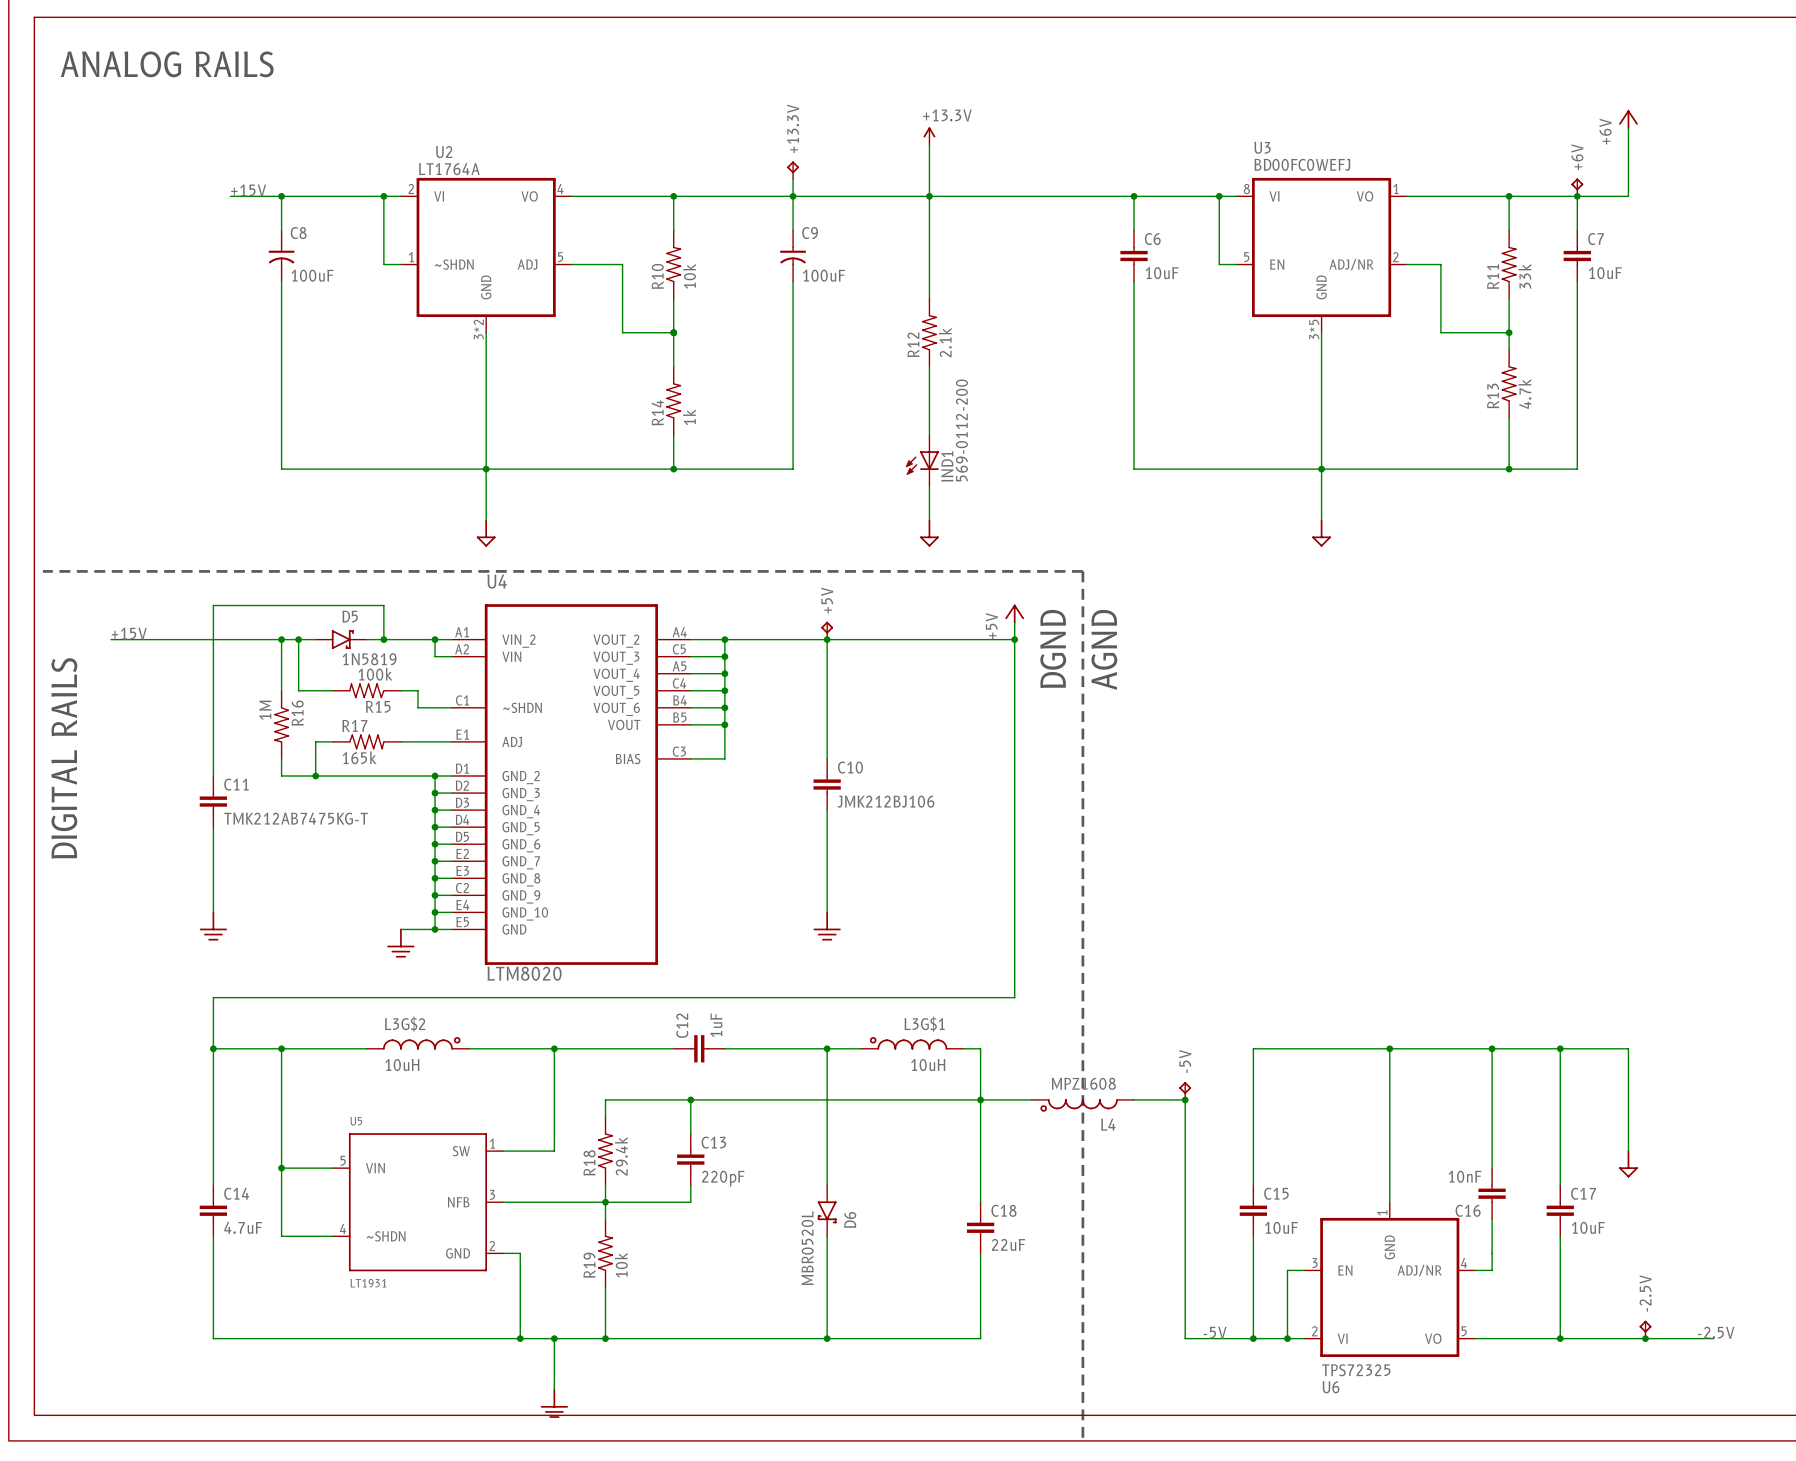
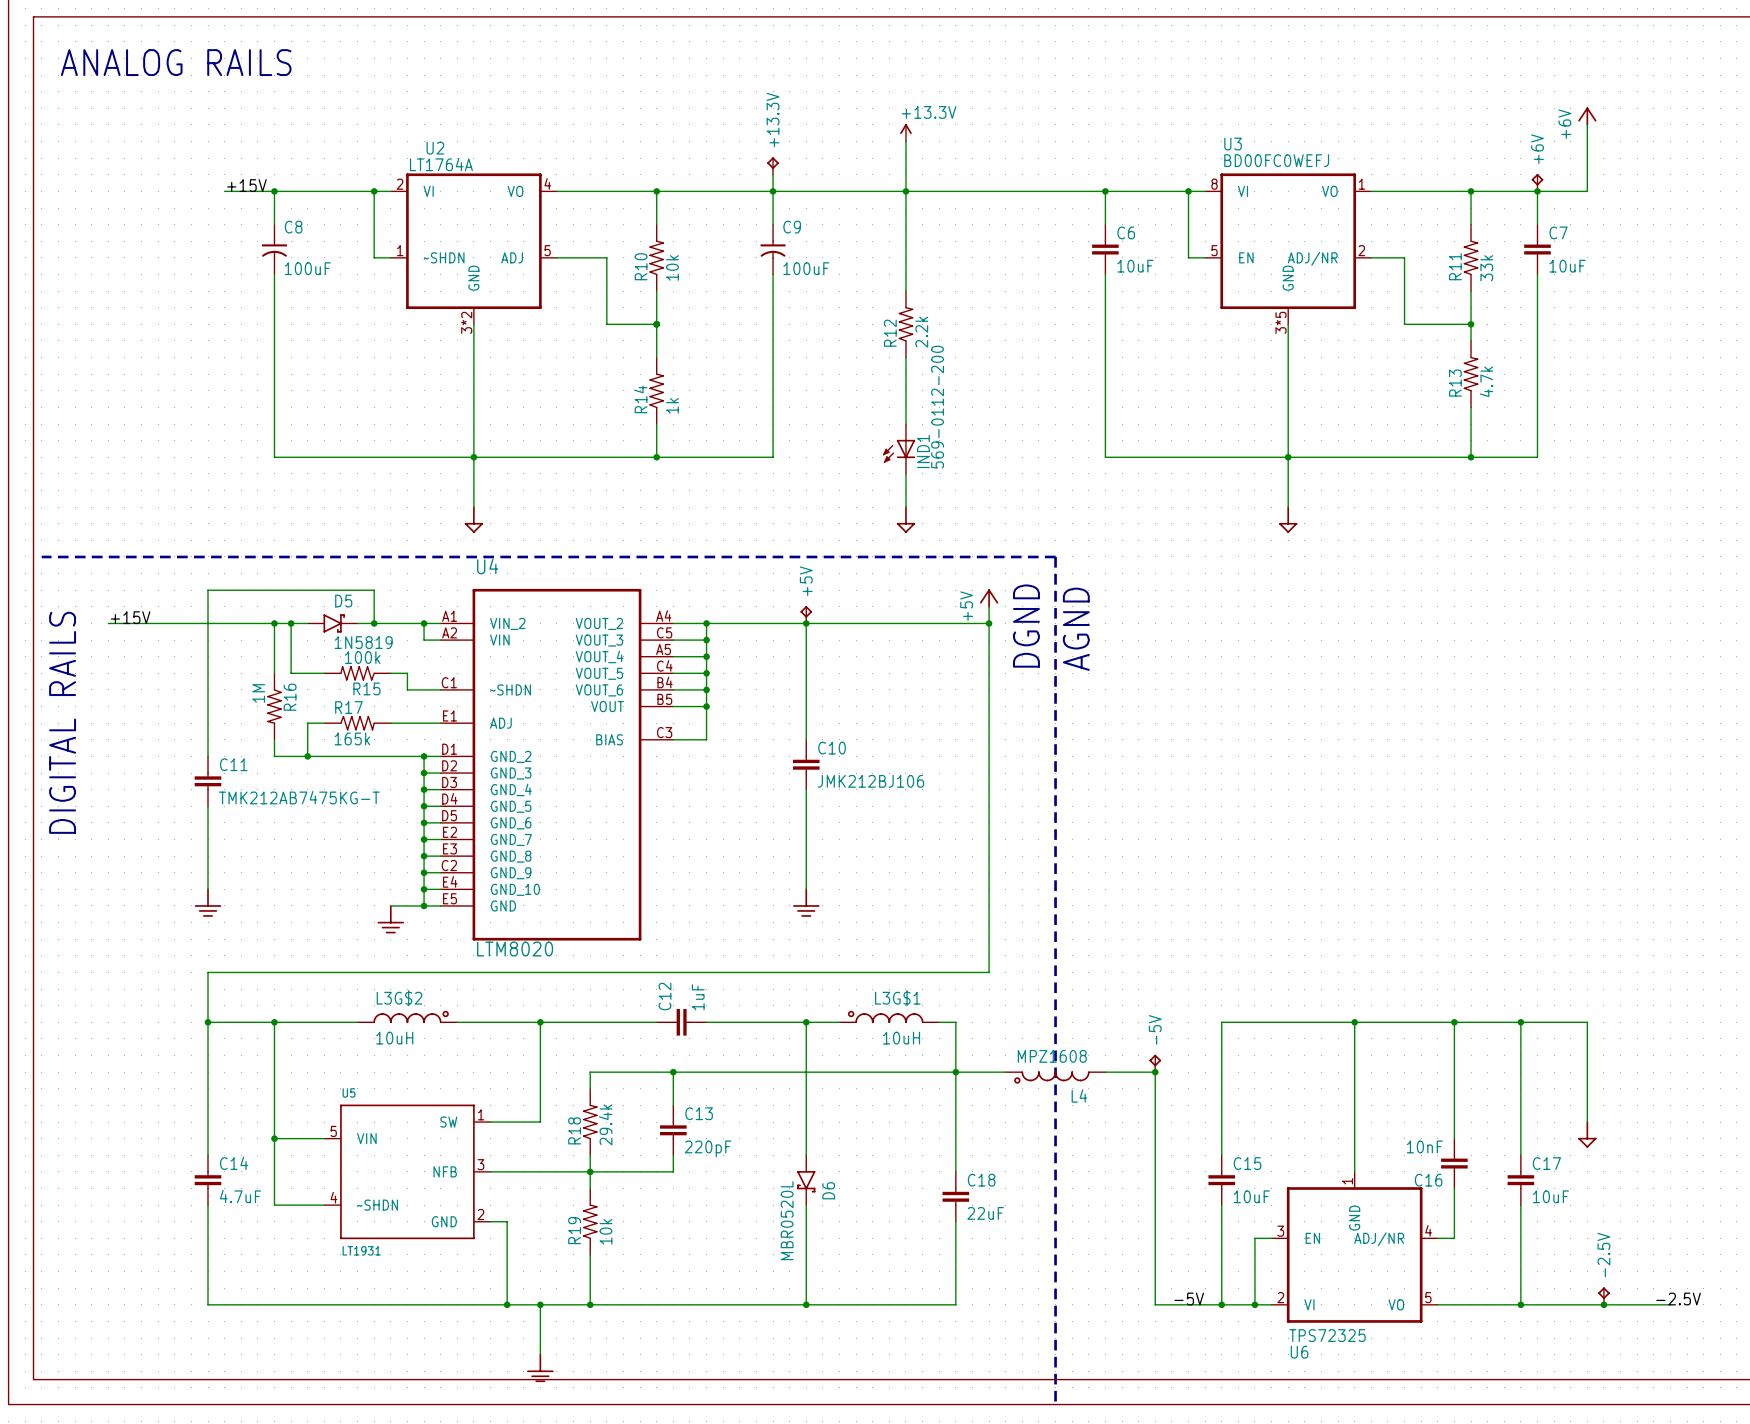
R12 value: 2.1k (945, 342) -> 2.2k (921, 332)

